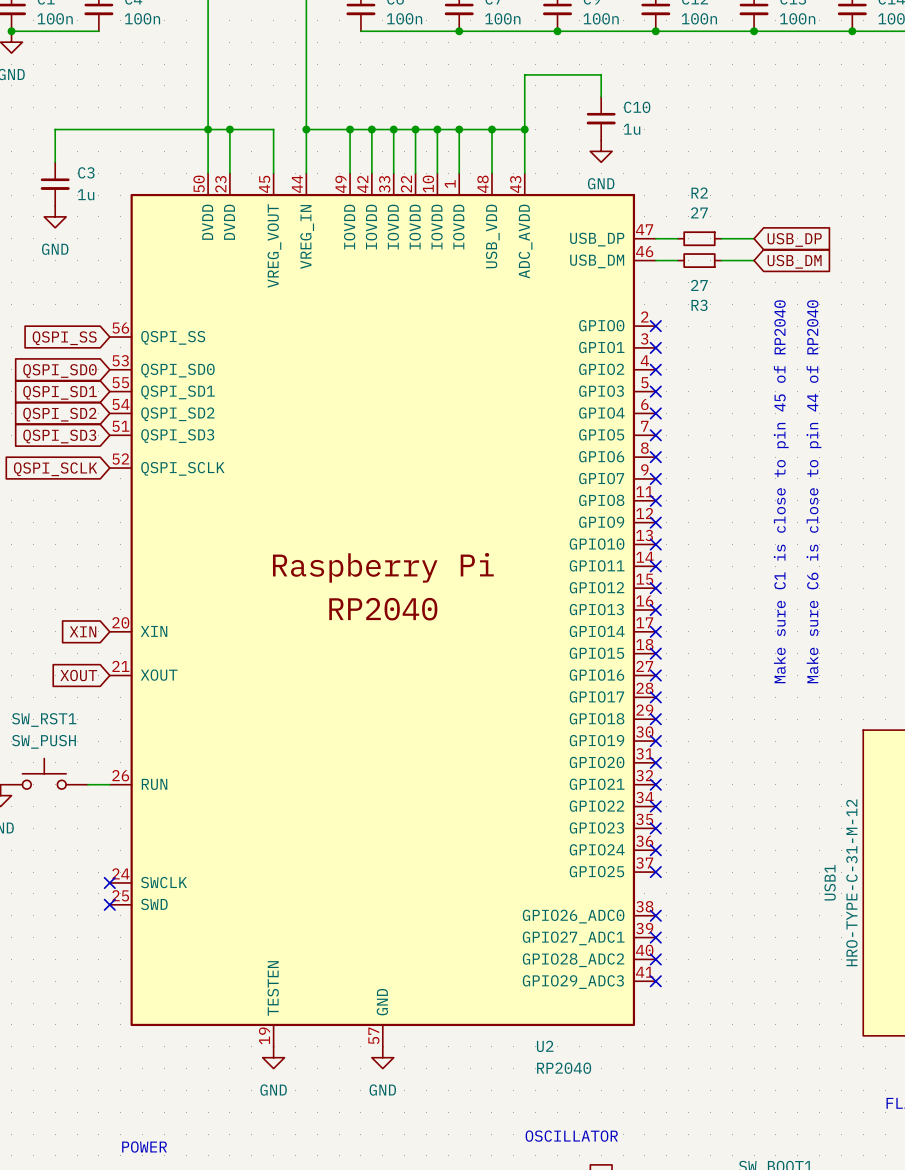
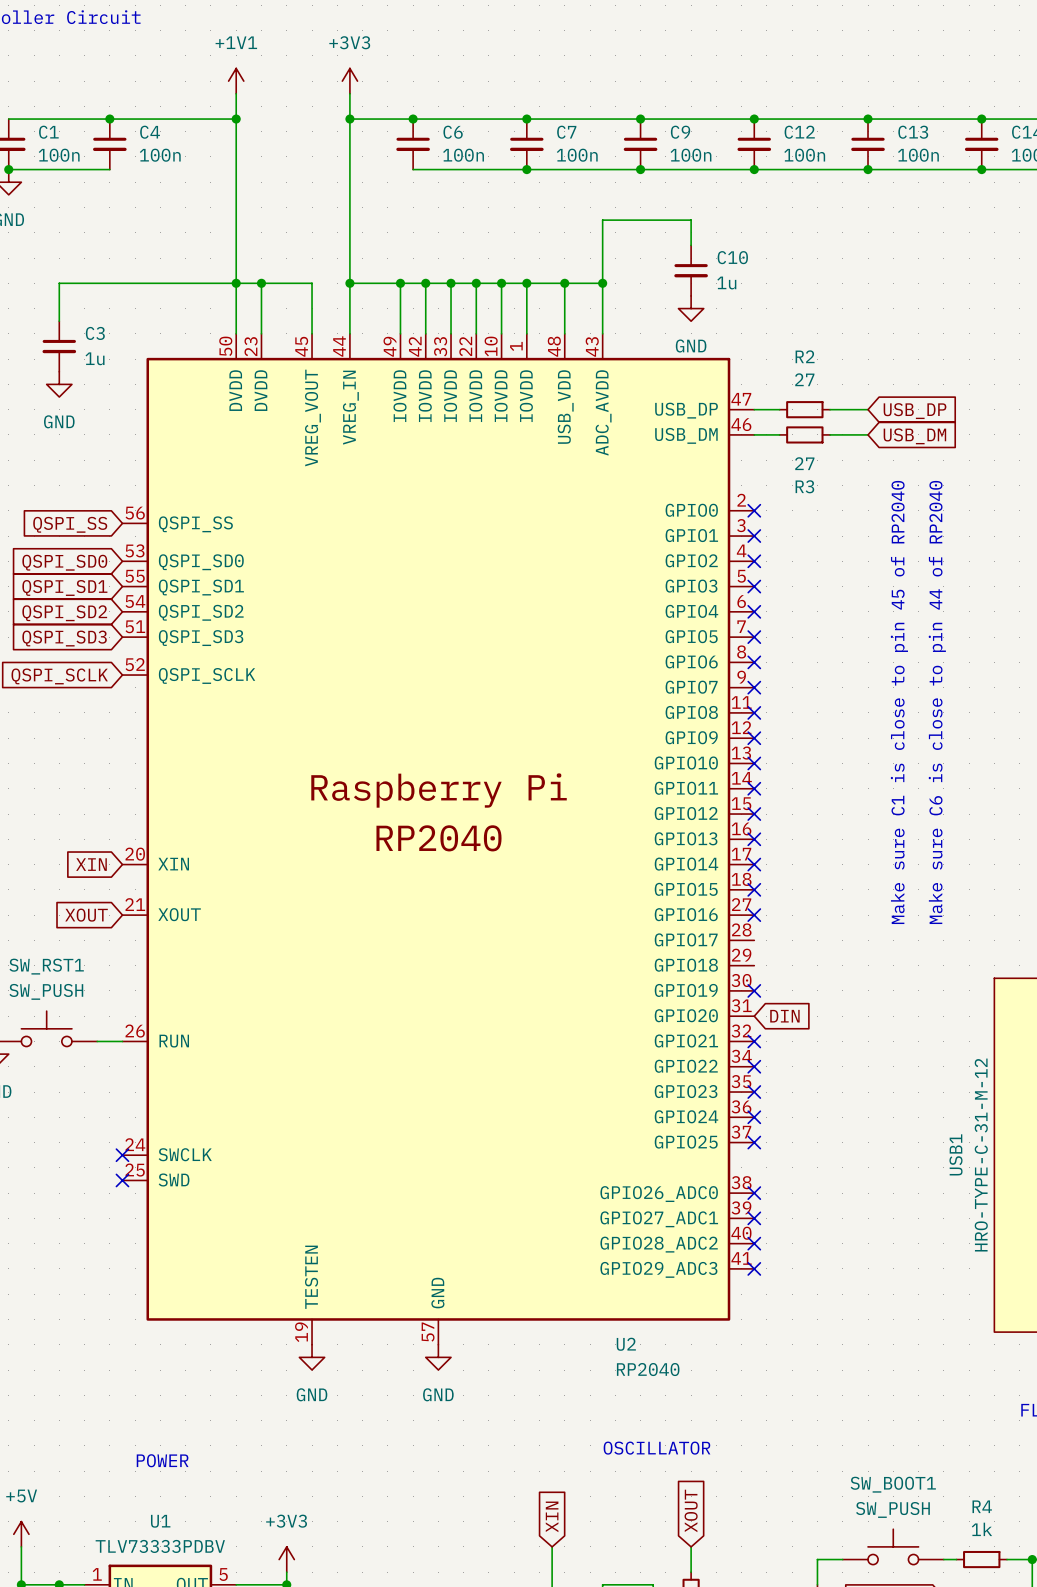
no-connect mark: (655, 697) -> none
no-connect mark: (655, 719) -> none
no-connect mark: (655, 762) -> none
global label: none -> DIN (784, 1016)

